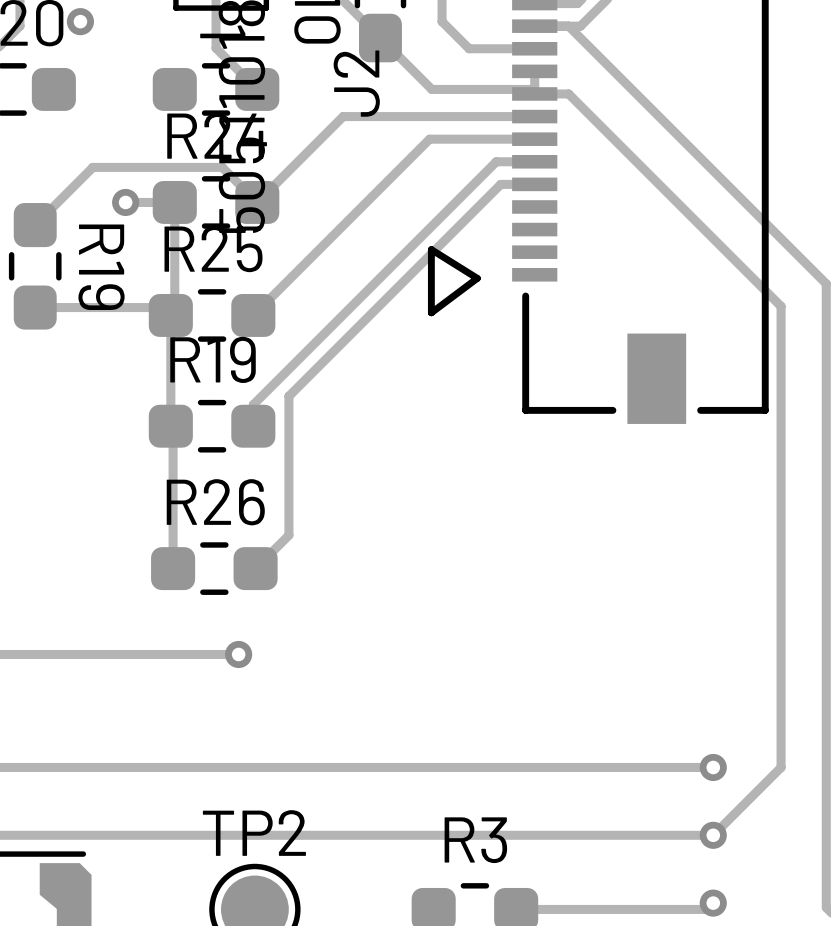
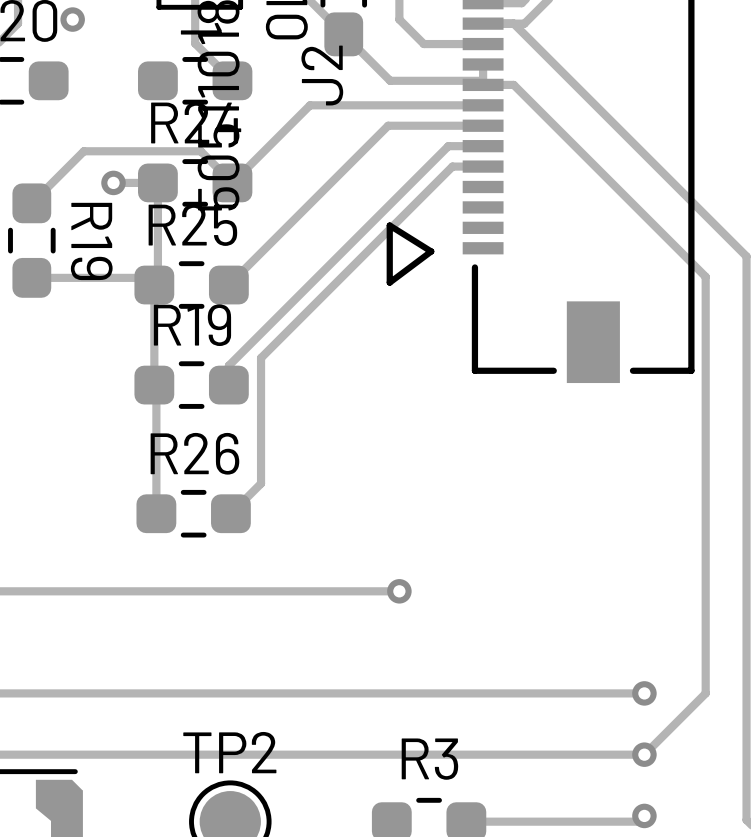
via position: (238, 654) -> (399, 591)
track: none -> (399, 591) (215, 591)

